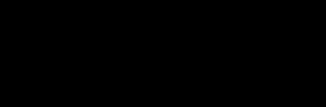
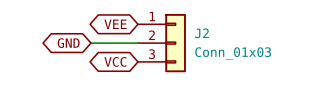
global label: none -> VEE (115, 24)
global label: none -> GND (68, 43)
wire: none -> (90, 43) (137, 43)
J2: none -> Conn_01x03 (161, 43)
global label: none -> VCC (115, 61)

